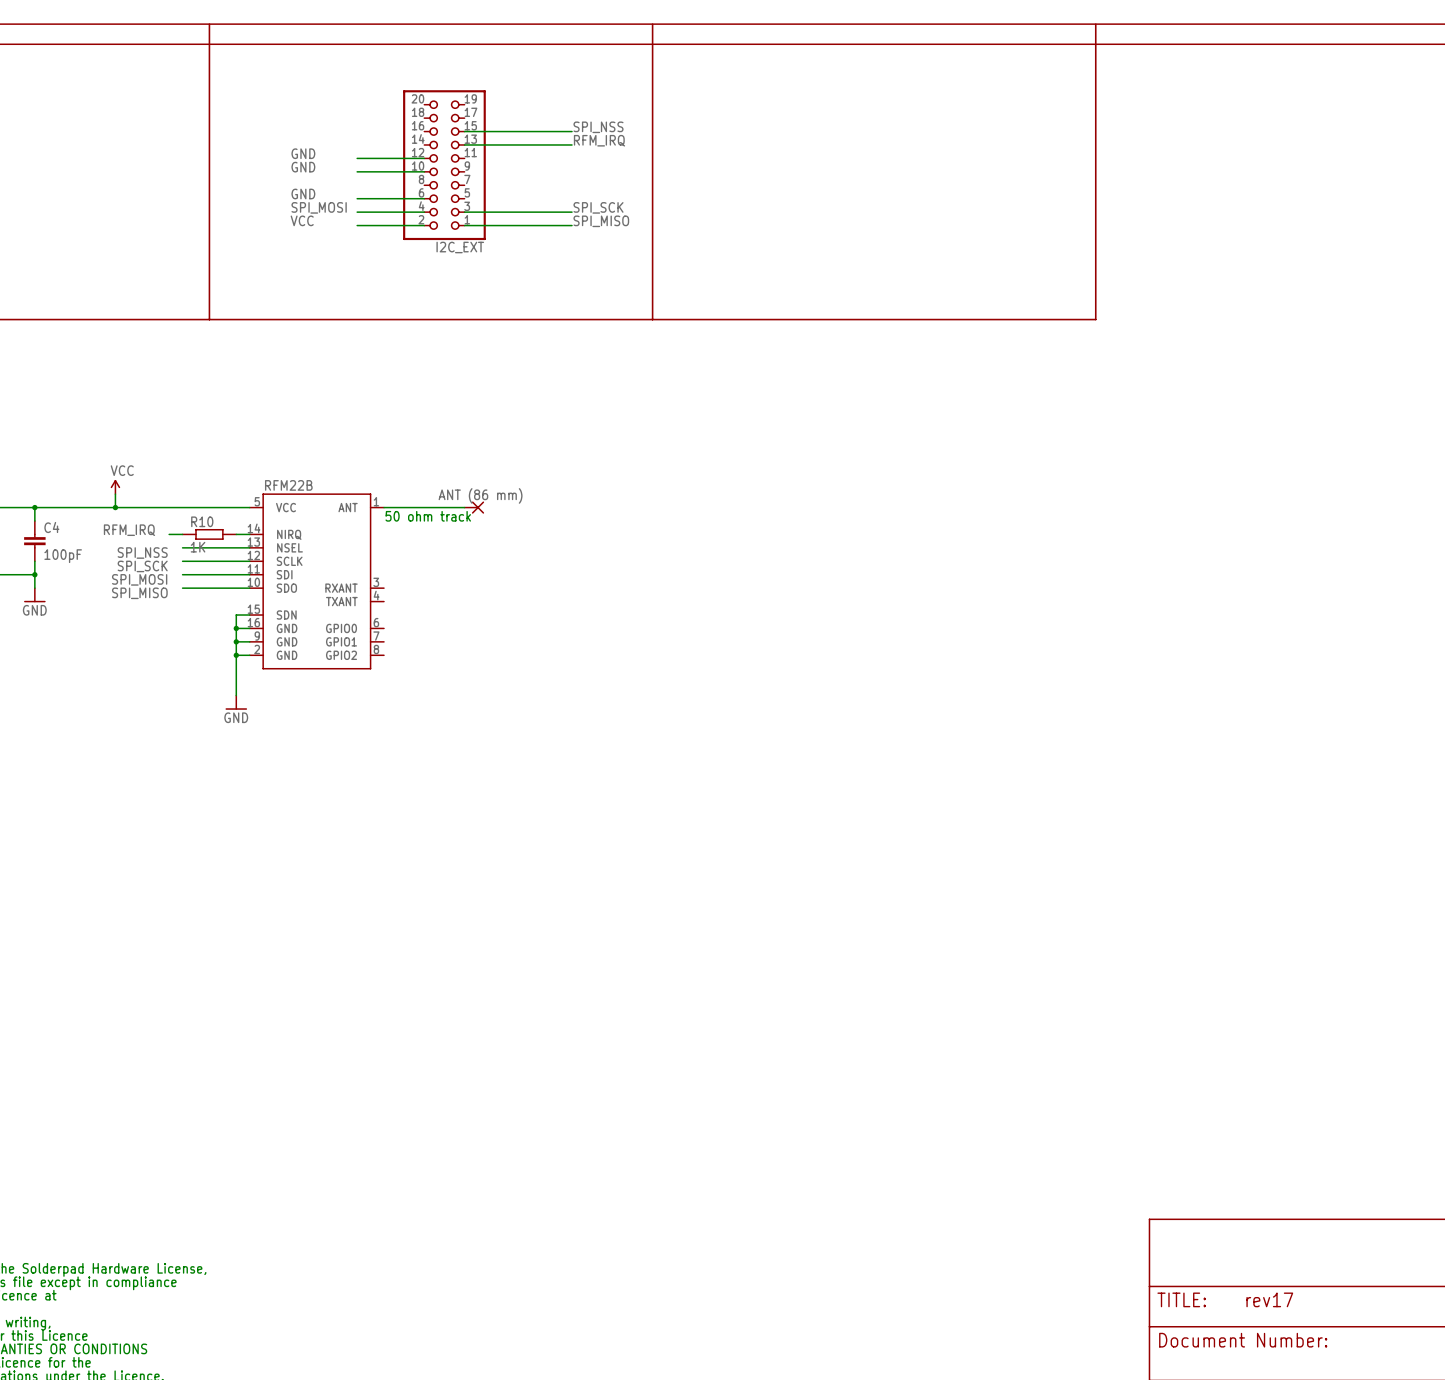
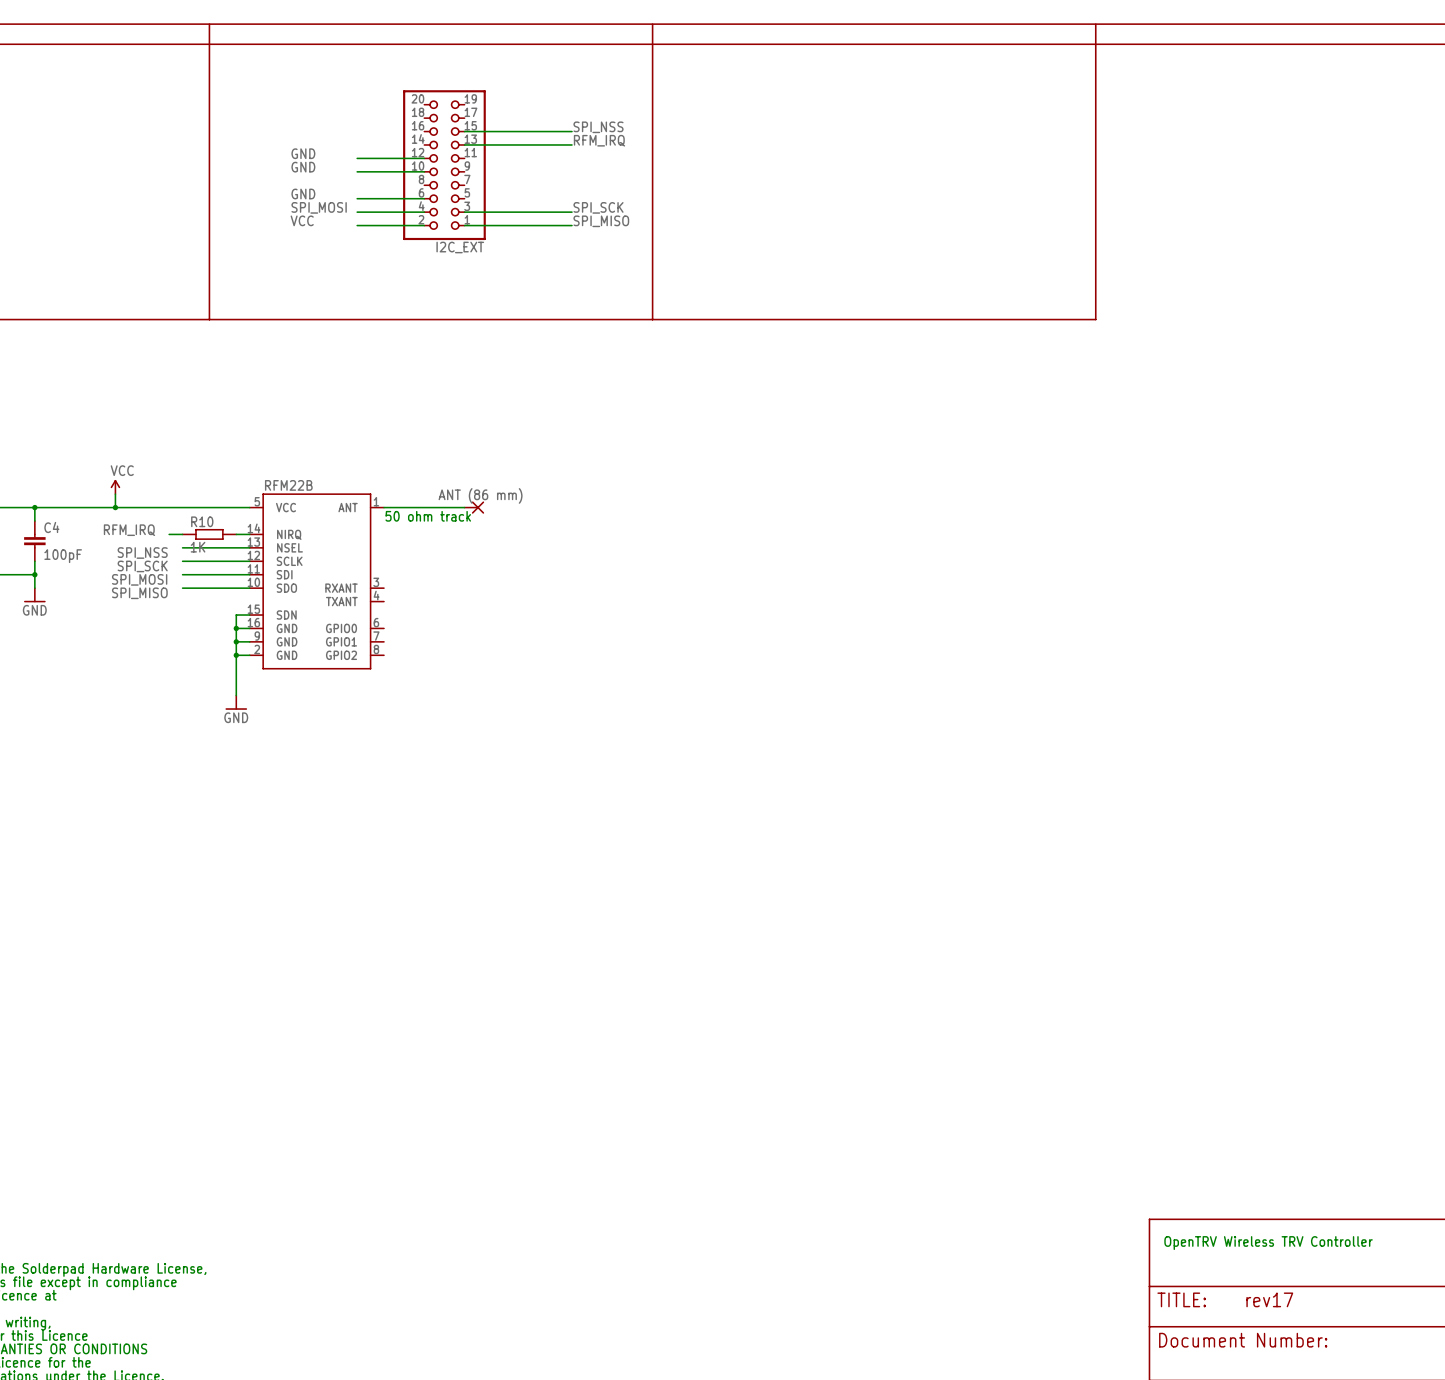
text: none -> OpenTRV Wireless TRV Controller (1268, 1243)

